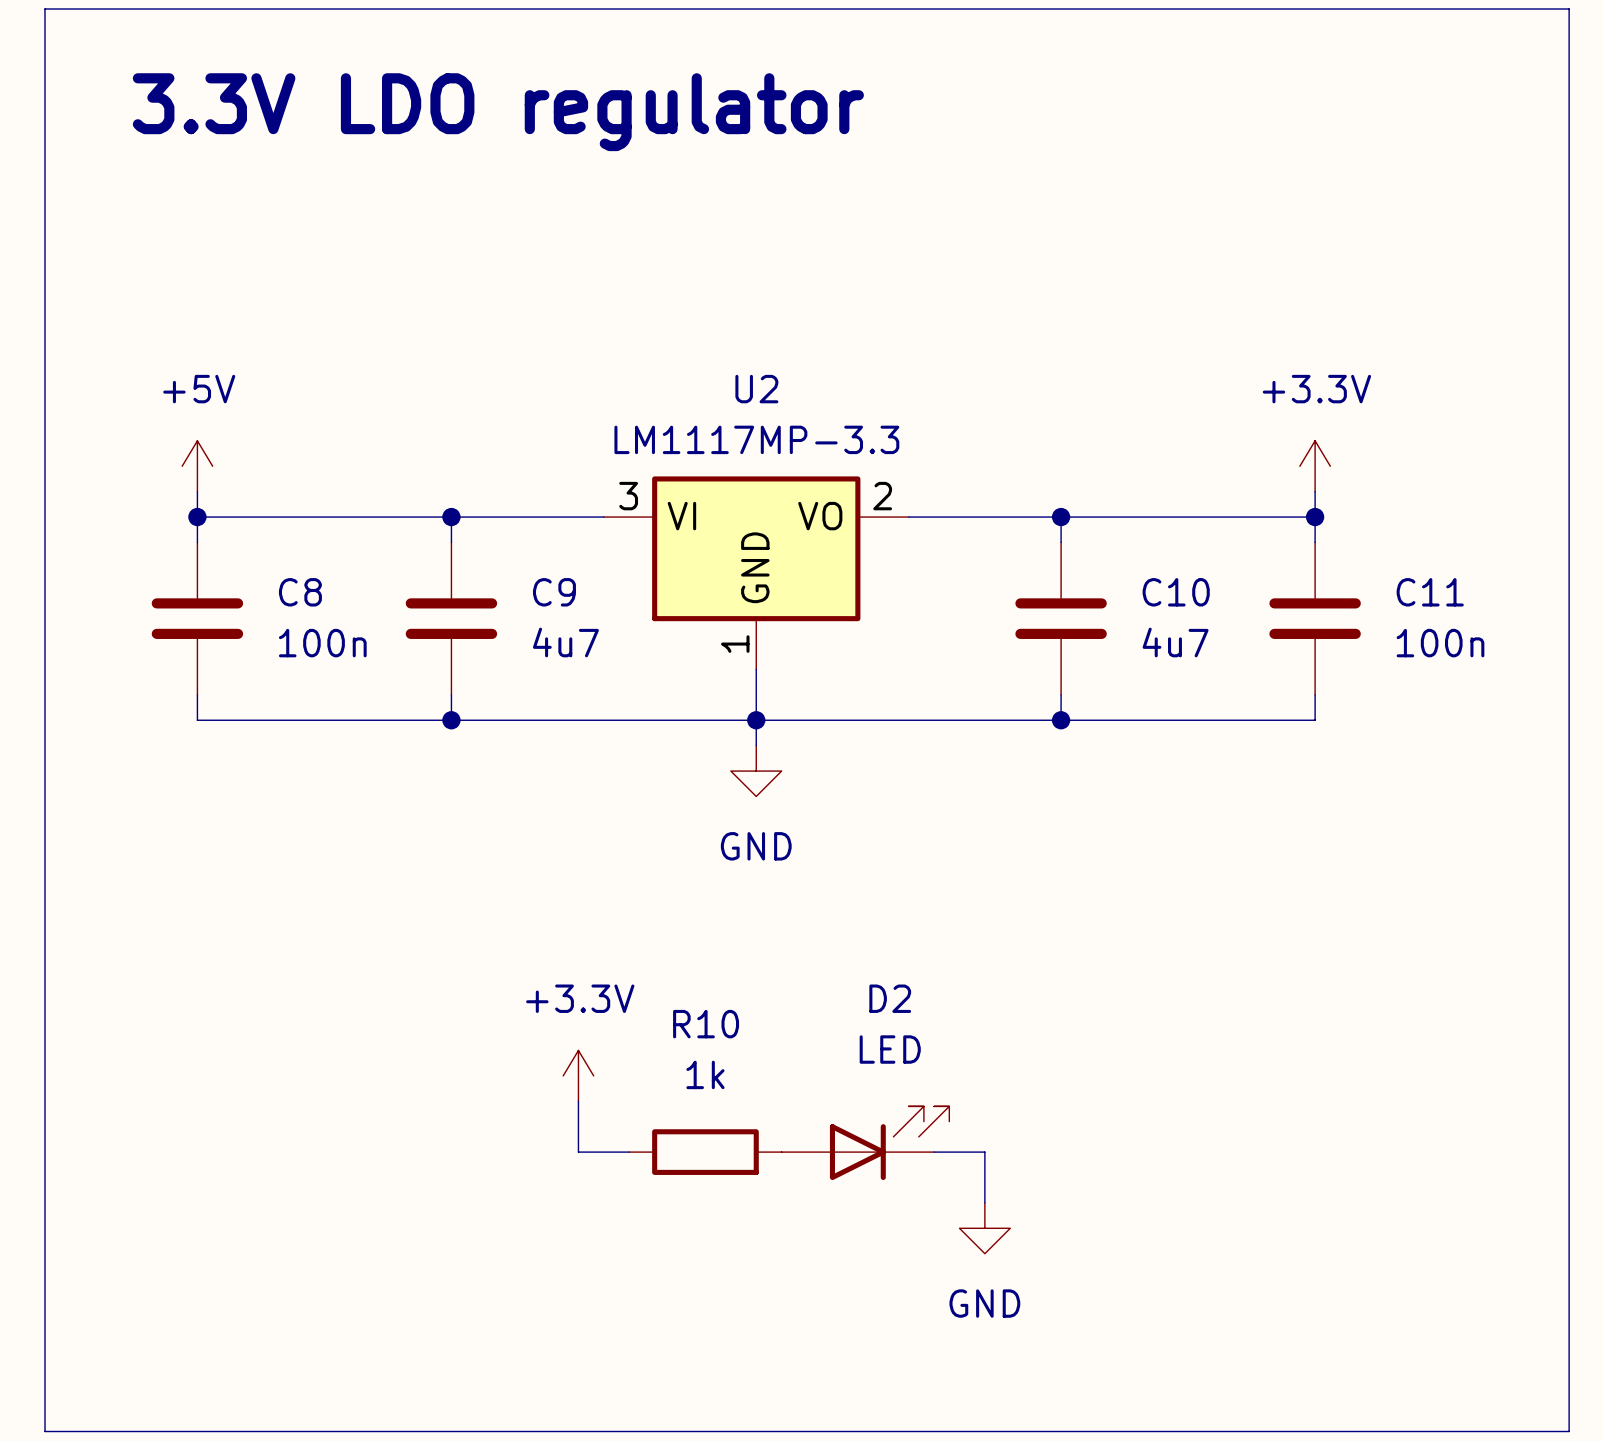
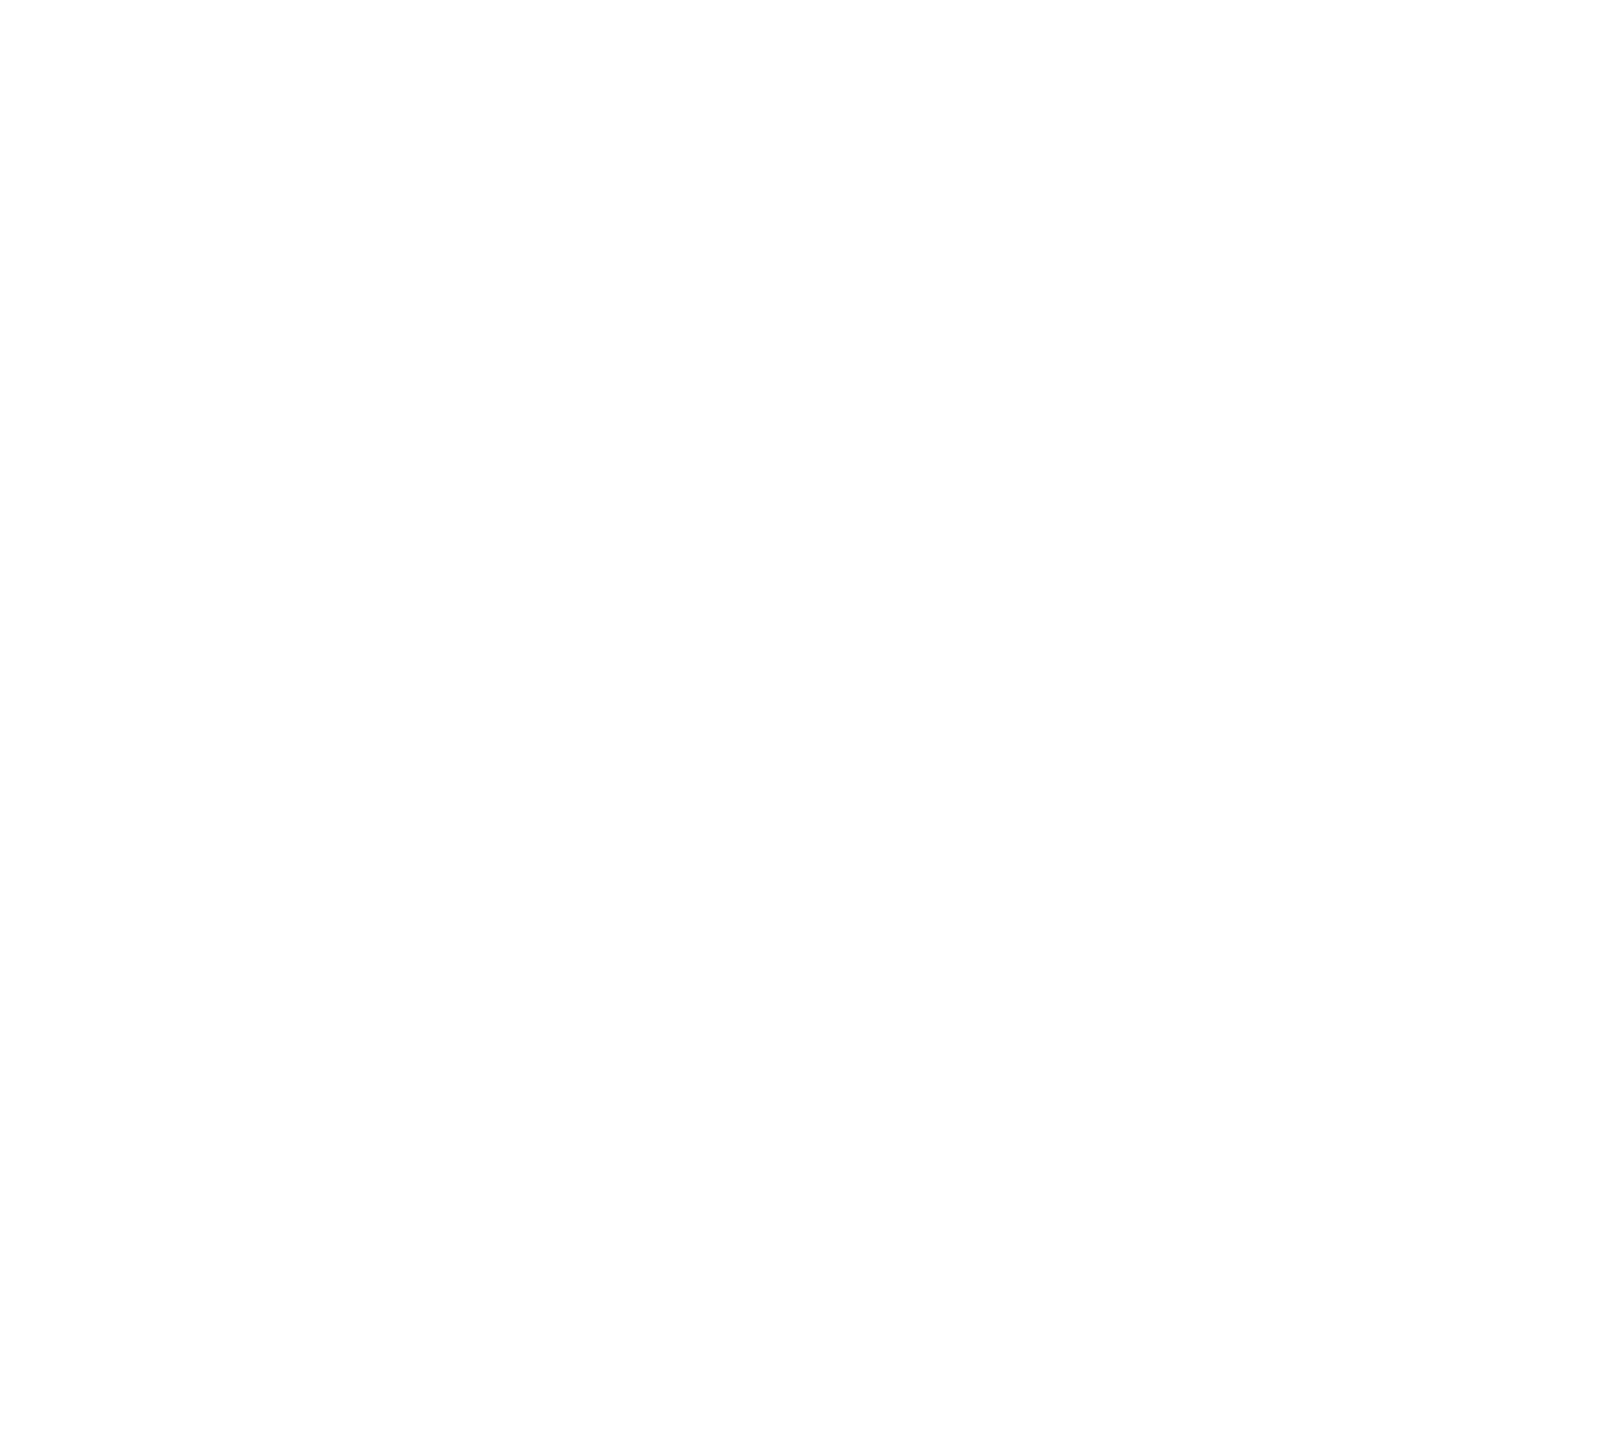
line: (45, 9) (1569, 9) (1569, 1431) (45, 1431) (45, 9) -> none
text: 3.3V LDO regulator (498, 112) -> none
power symbol: +5V (197, 466) -> none
power symbol: +3.3V (1315, 466) -> none
wire: (197, 491) (197, 542) -> none
wire: (1315, 491) (1315, 542) -> none
wire: (197, 517) (603, 517) -> none
junction: (197, 517) -> none
wire: (451, 517) (451, 542) -> none
junction: (451, 517) -> none
wire: (908, 517) (1315, 517) -> none
wire: (1061, 517) (1061, 542) -> none
junction: (1061, 517) -> none
junction: (1315, 517) -> none
U2: LM1117MP-3.3 (756, 572) -> none
C8: 100n (197, 618) -> none
C9: 4u7 (451, 618) -> none
C10: 4u7 (1061, 618) -> none
C11: 100n (1315, 618) -> none
wire: (756, 669) (756, 745) -> none
wire: (197, 694) (197, 720) (1315, 720) (1315, 694) -> none
wire: (451, 694) (451, 720) -> none
wire: (1061, 694) (1061, 720) -> none
junction: (451, 720) -> none
junction: (756, 720) -> none
junction: (1061, 720) -> none
power symbol: GND (756, 771) -> none
power symbol: +3.3V (578, 1075) -> none
wire: (578, 1101) (578, 1152) (629, 1152) -> none
D2: LED (865, 1143) -> none
R10: 1k (705, 1152) -> none
wire: (934, 1152) (984, 1152) (984, 1202) -> none
power symbol: GND (984, 1228) -> none

